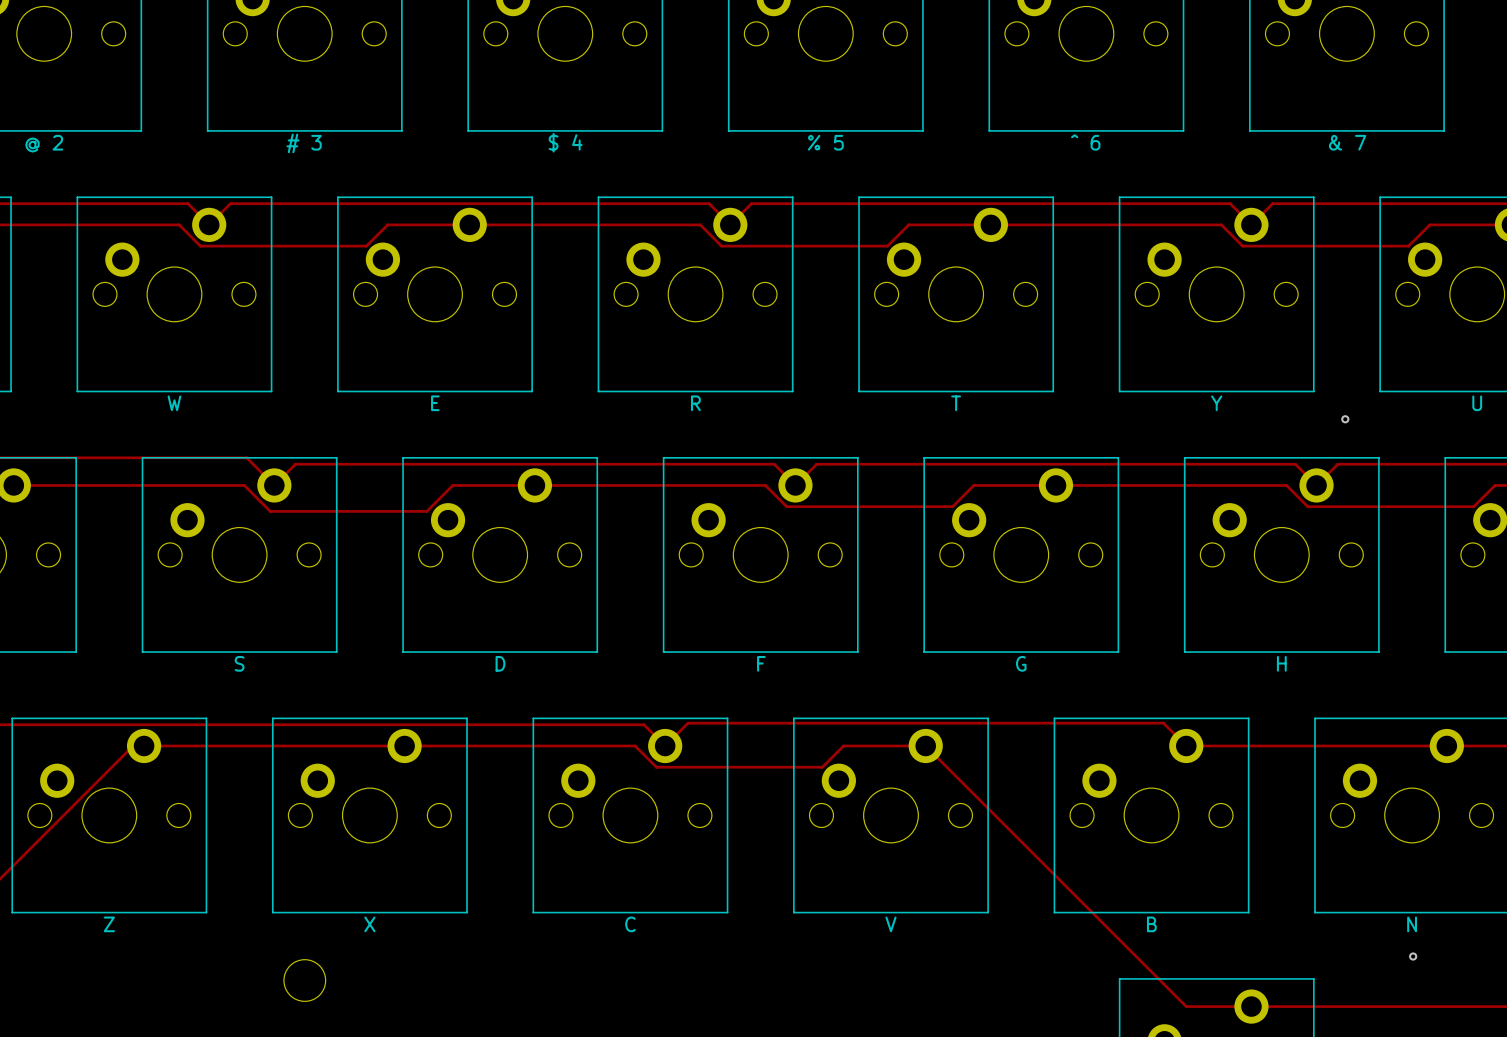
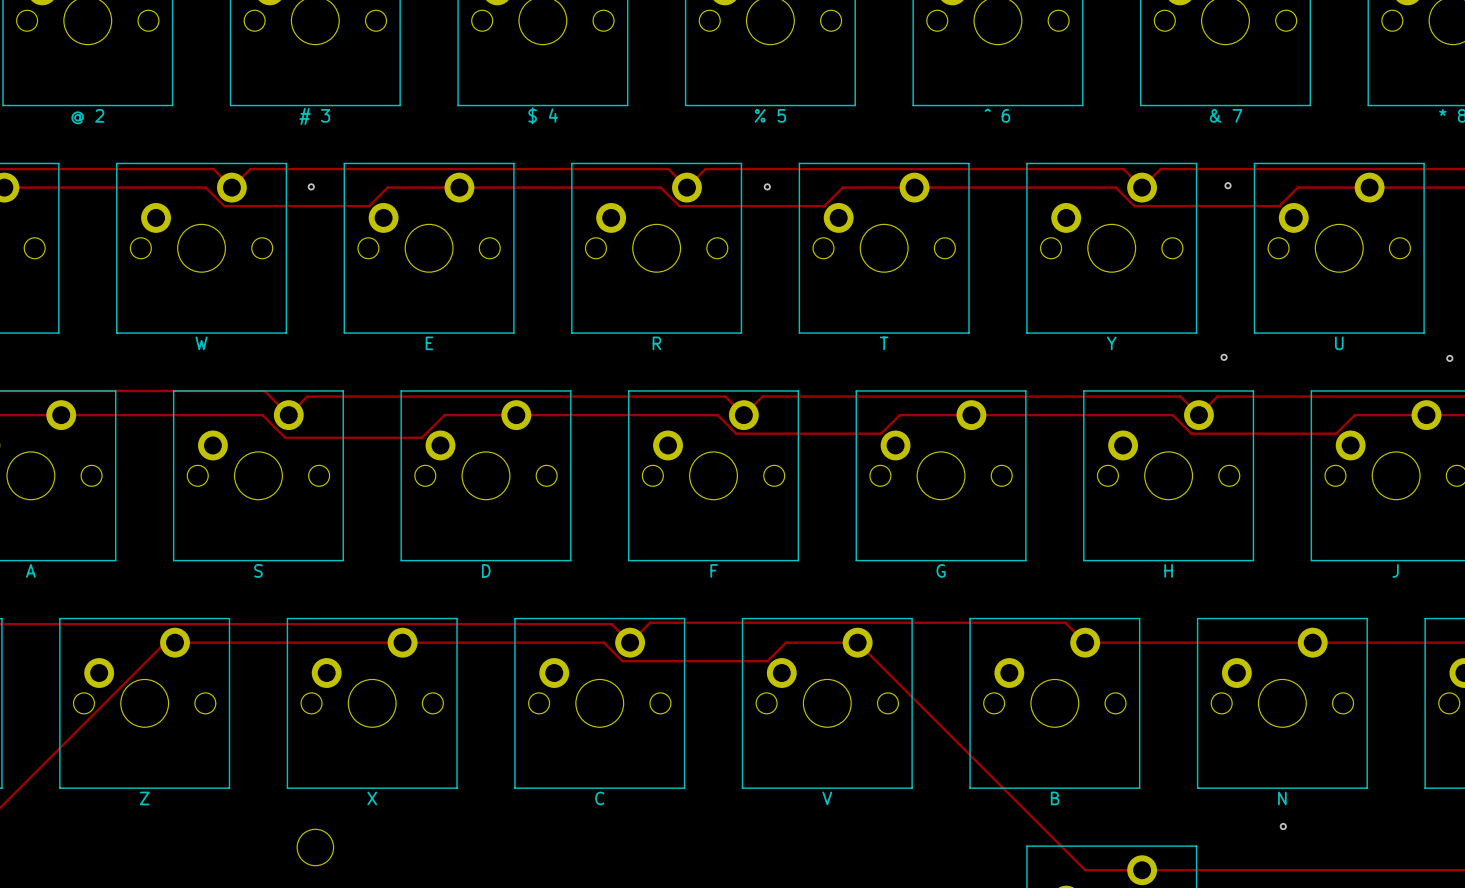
via: none -> (1228, 185)
via: none -> (311, 186)
via: none -> (767, 186)

